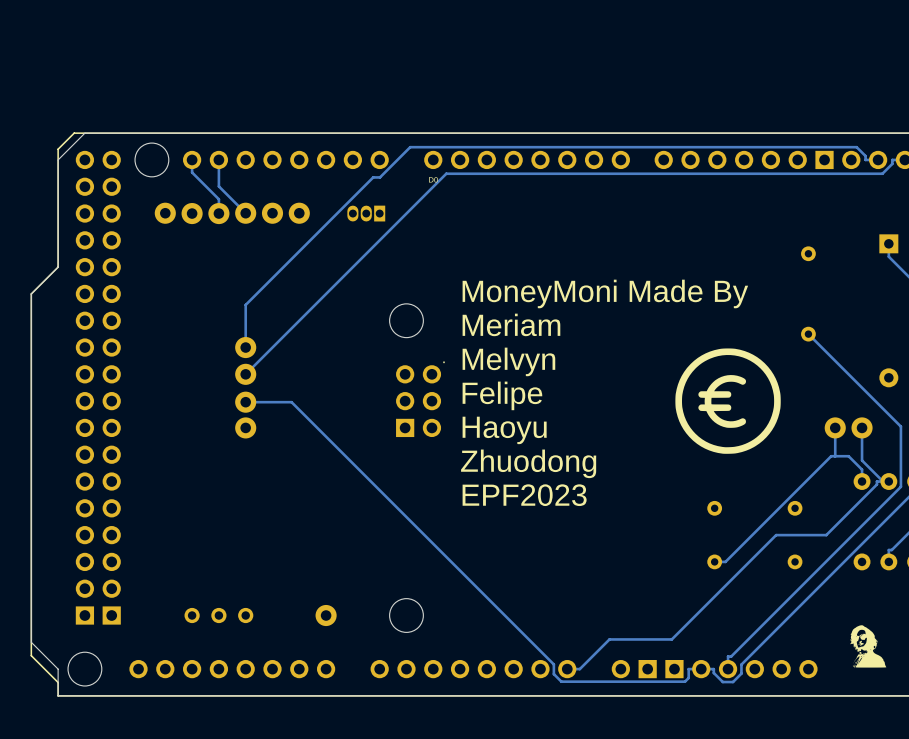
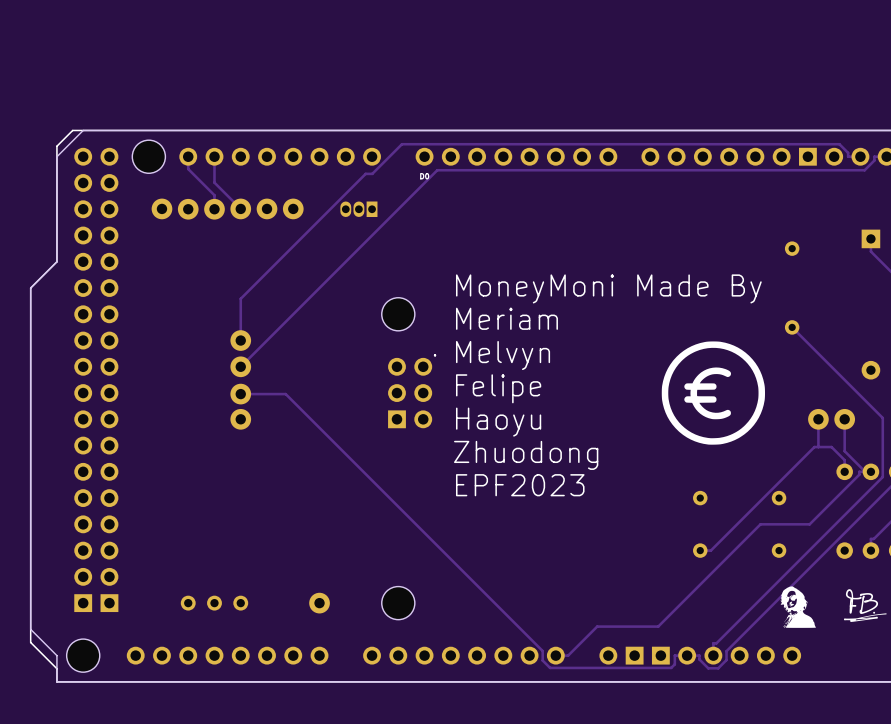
drawing: none -> [843, 589, 887, 622]
drawing position: (868, 646) -> (798, 607)

